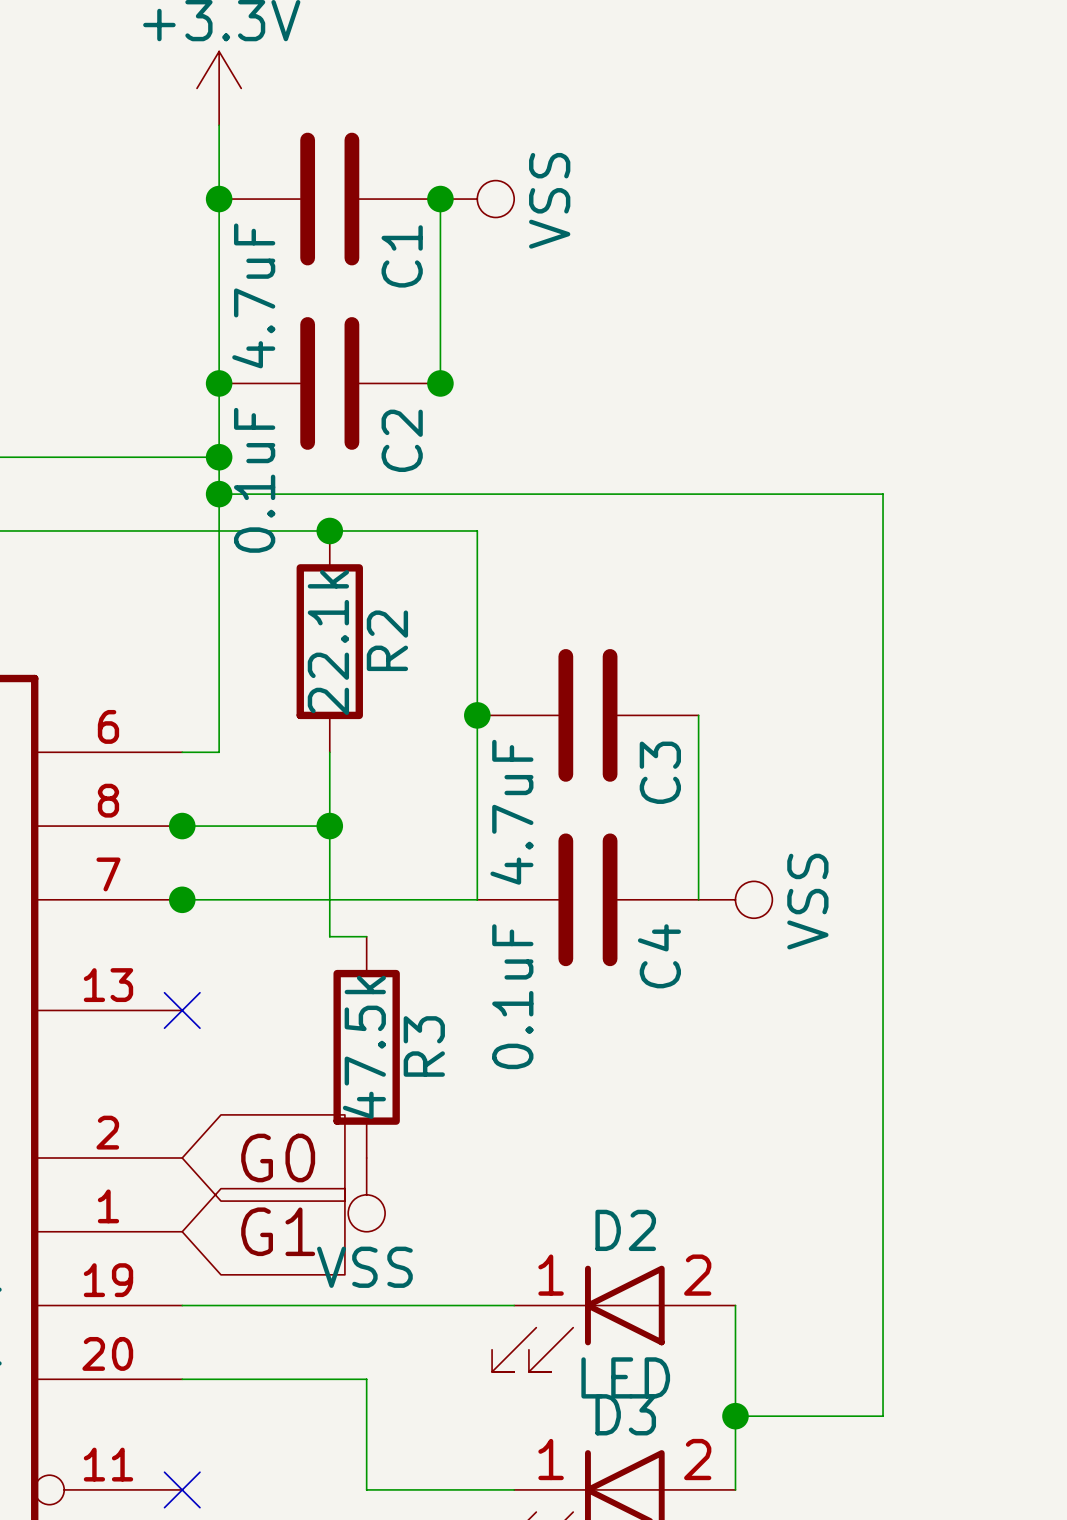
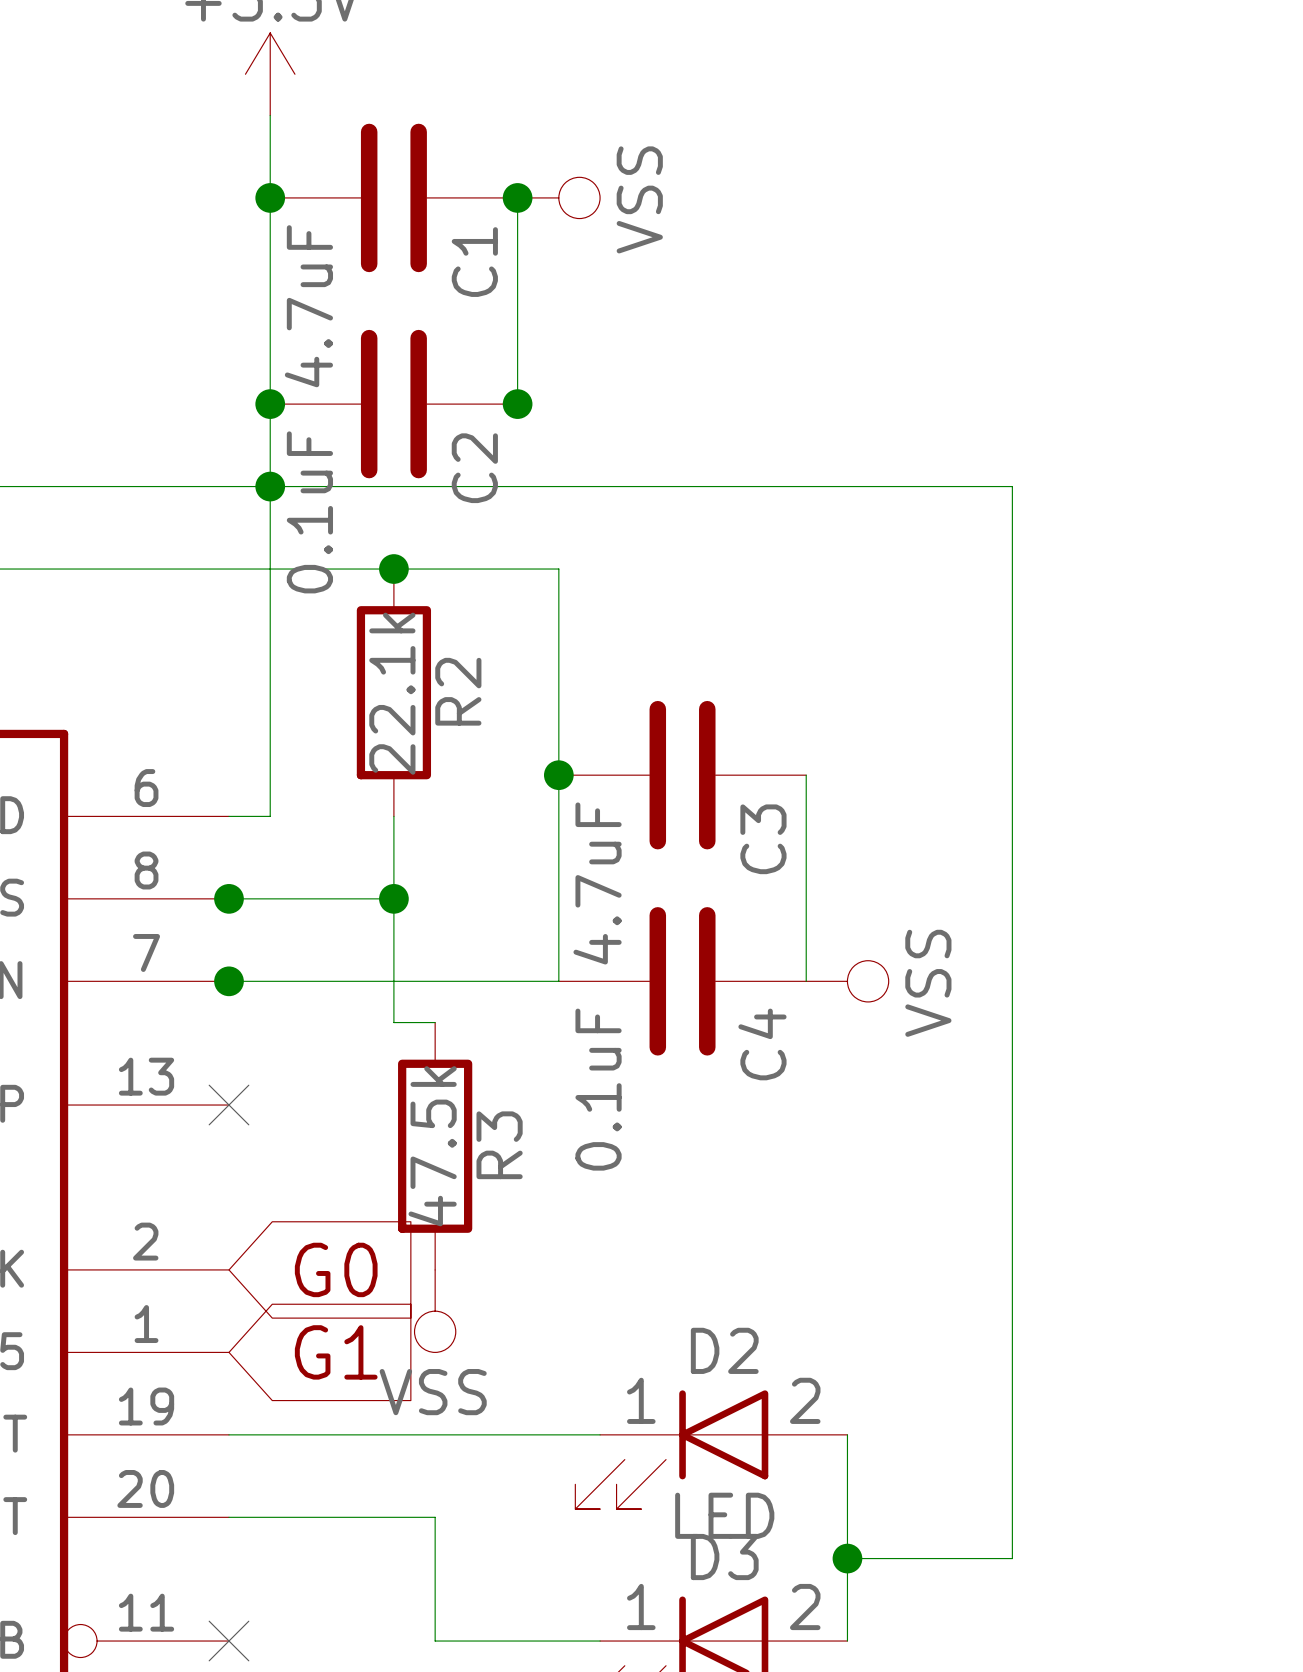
wire: (219, 494) (883, 494) -> (270, 486) (1012, 486) (1012, 527)
junction: (219, 494) -> none

